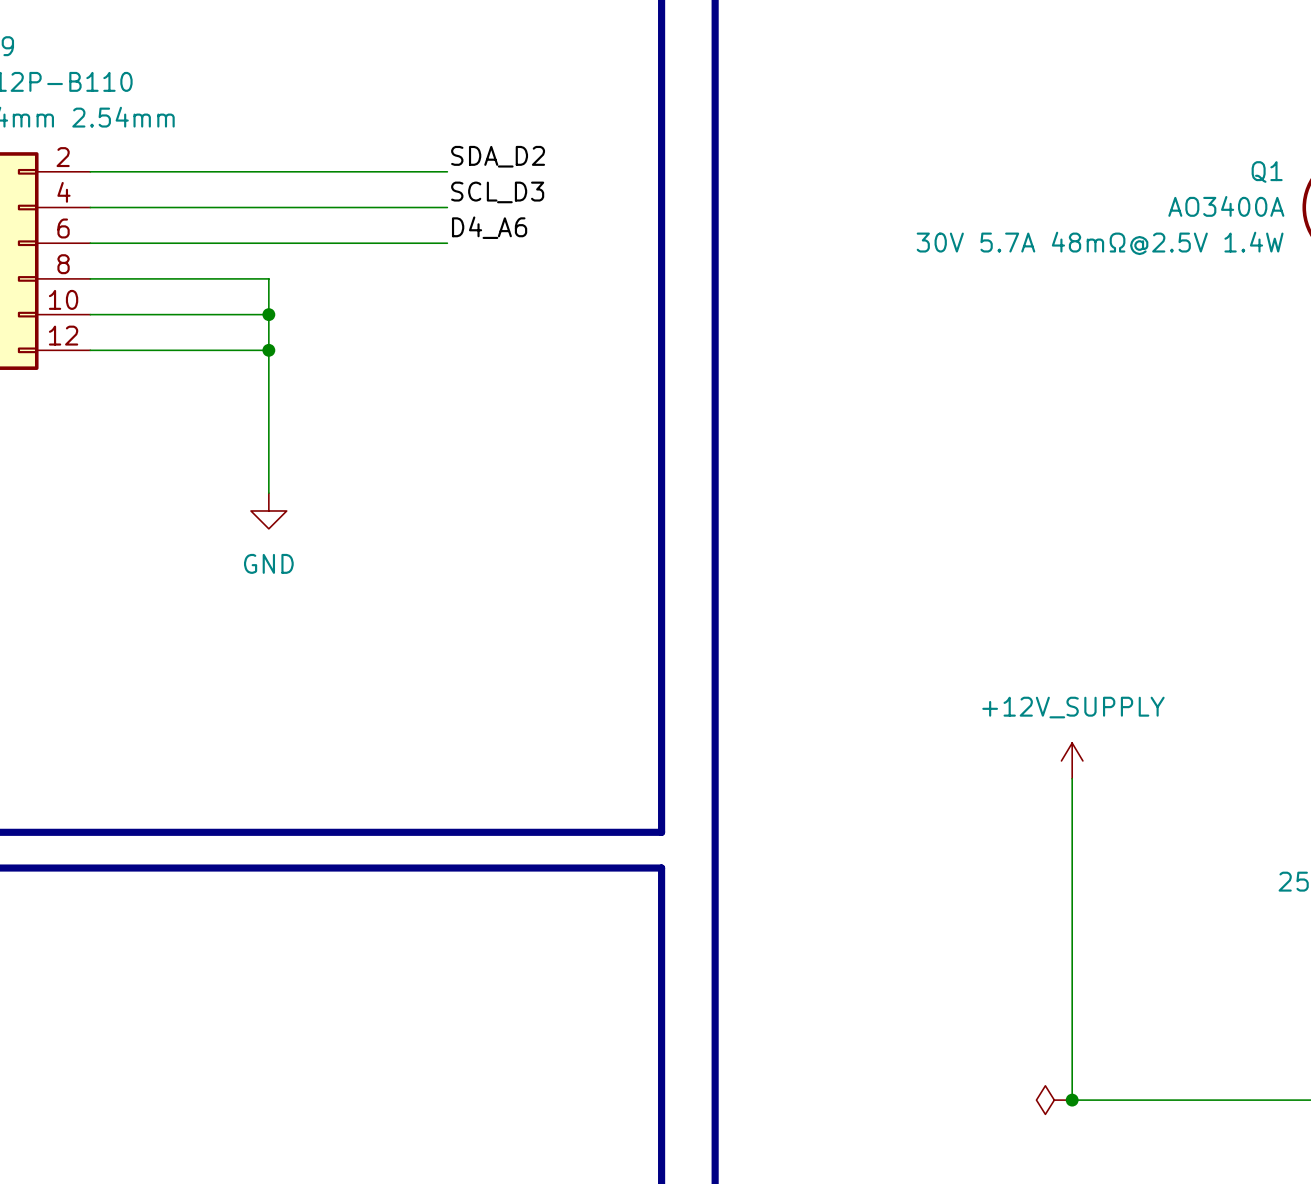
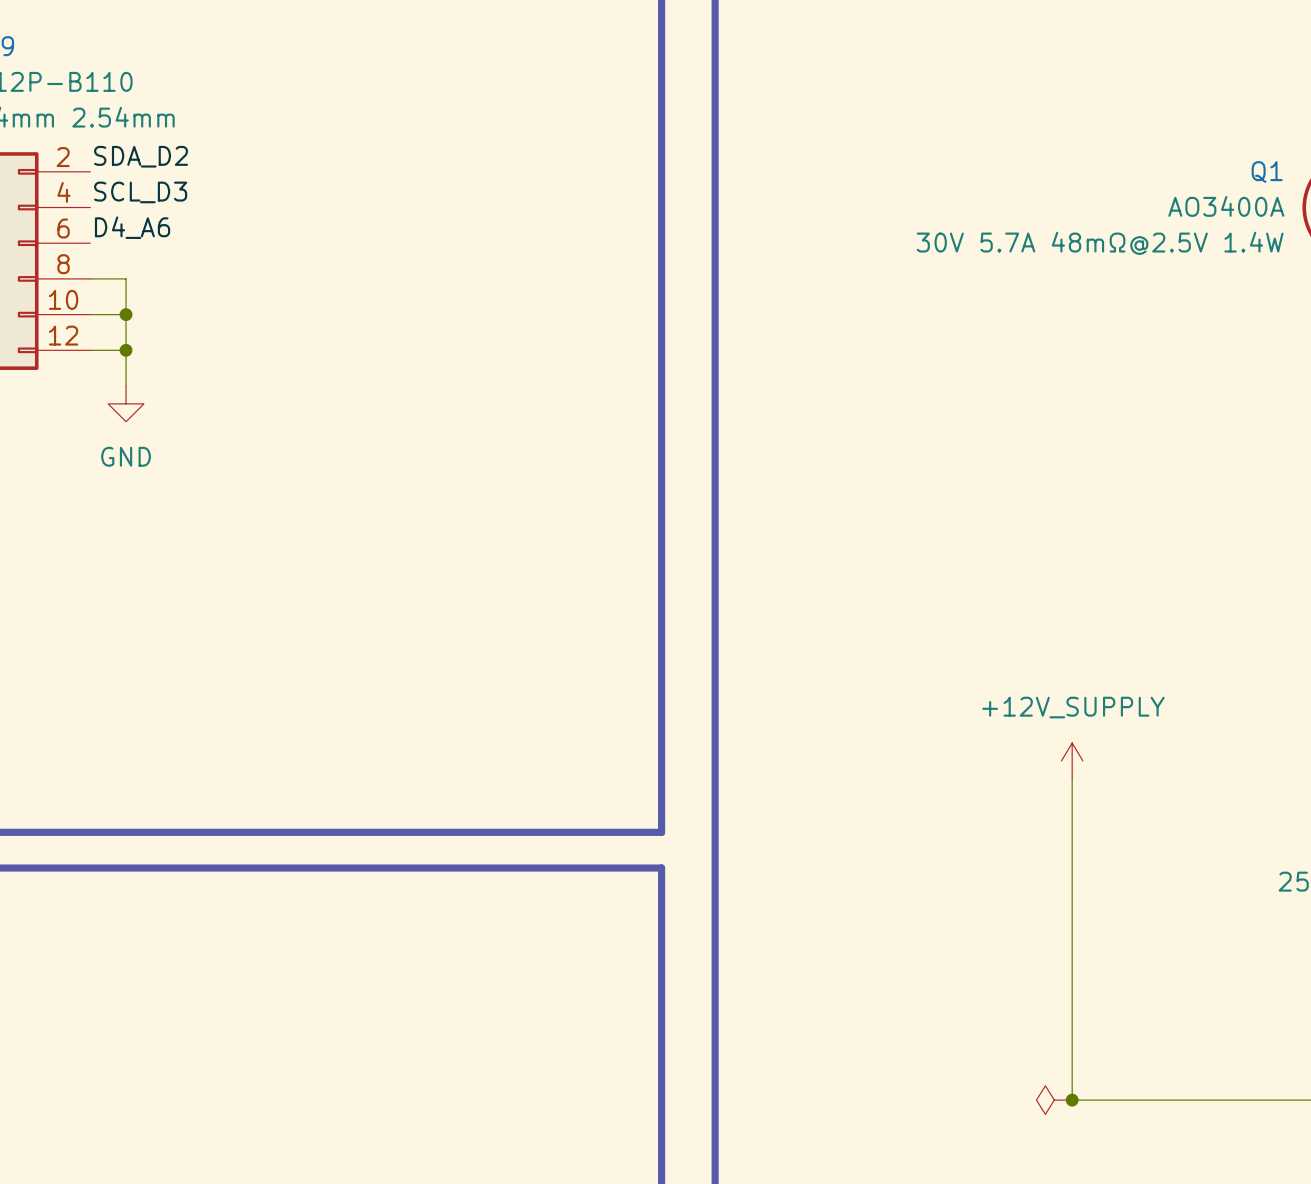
label: none -> SDA_D2 (141, 156)
label: SDA_D2 (498, 156) -> none
wire: (90, 171) (447, 171) -> none
label: none -> SCL_D3 (140, 192)
label: SCL_D3 (497, 192) -> none
wire: (90, 207) (447, 207) -> none
label: none -> D4_A6 (132, 227)
label: D4_A6 (489, 227) -> none
wire: (90, 243) (447, 243) -> none
wire: (126, 278) (268, 278) (268, 493) -> (126, 278) (126, 386)
wire: (126, 314) (268, 314) -> none
junction: none -> (126, 314)
junction: (268, 314) -> none
wire: (126, 350) (268, 350) -> none
junction: none -> (126, 350)
junction: (268, 350) -> none
power symbol position: GND (268, 510) -> GND (126, 403)

